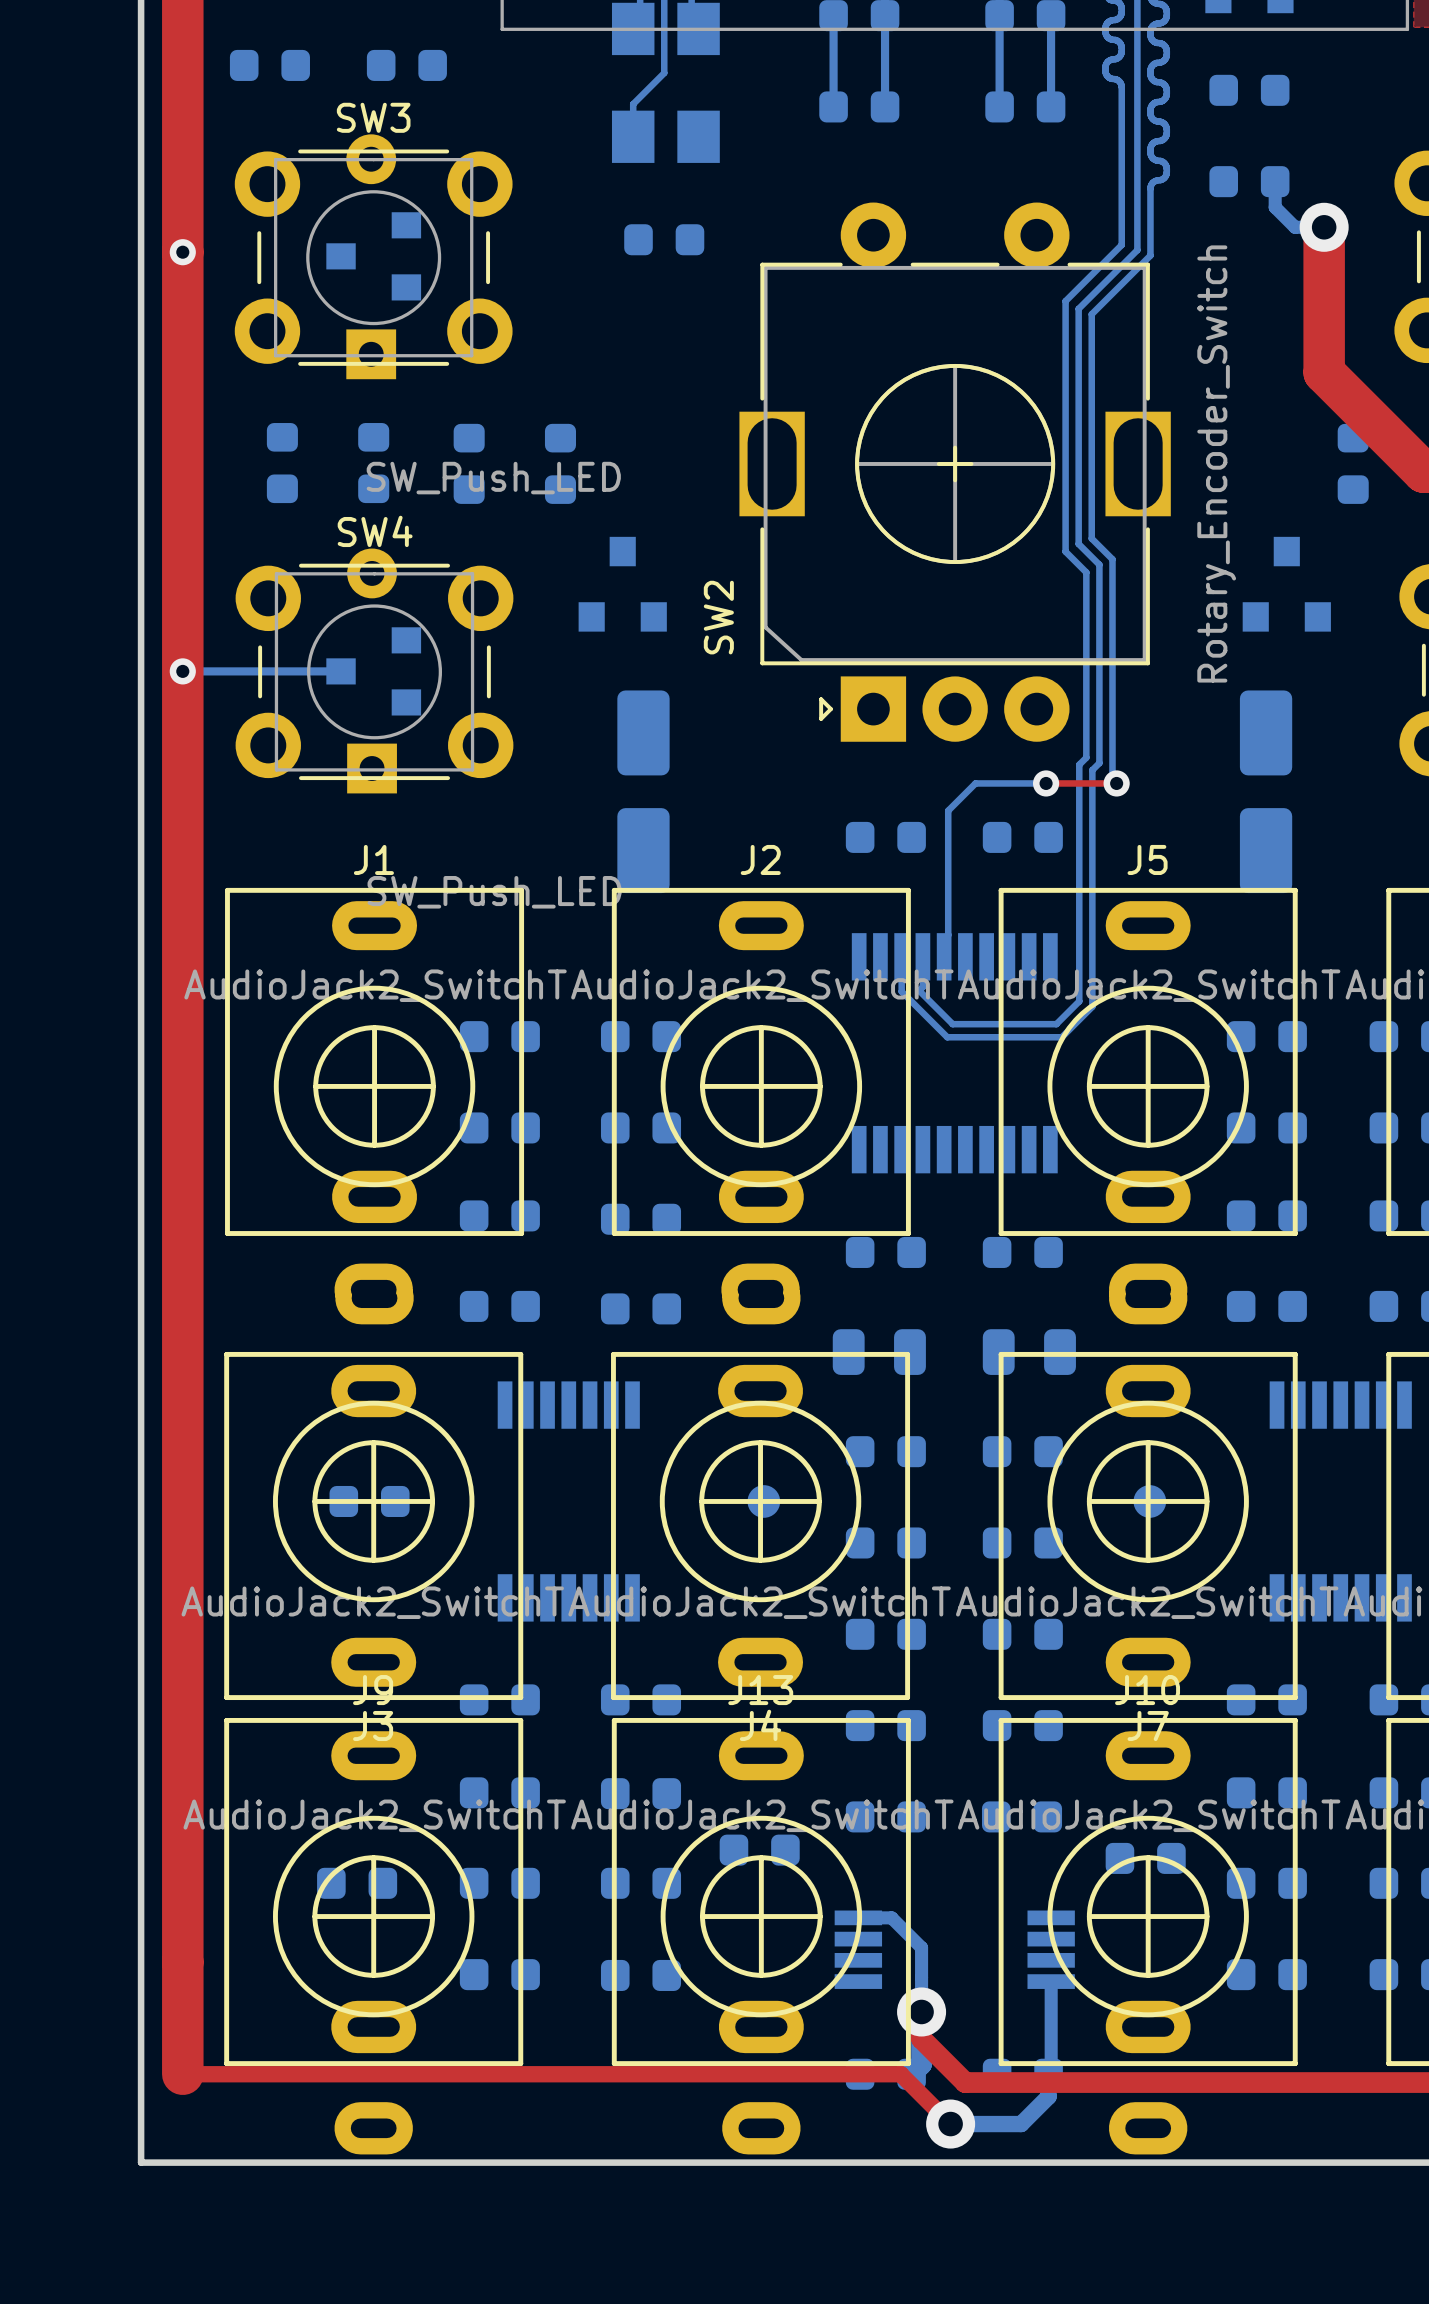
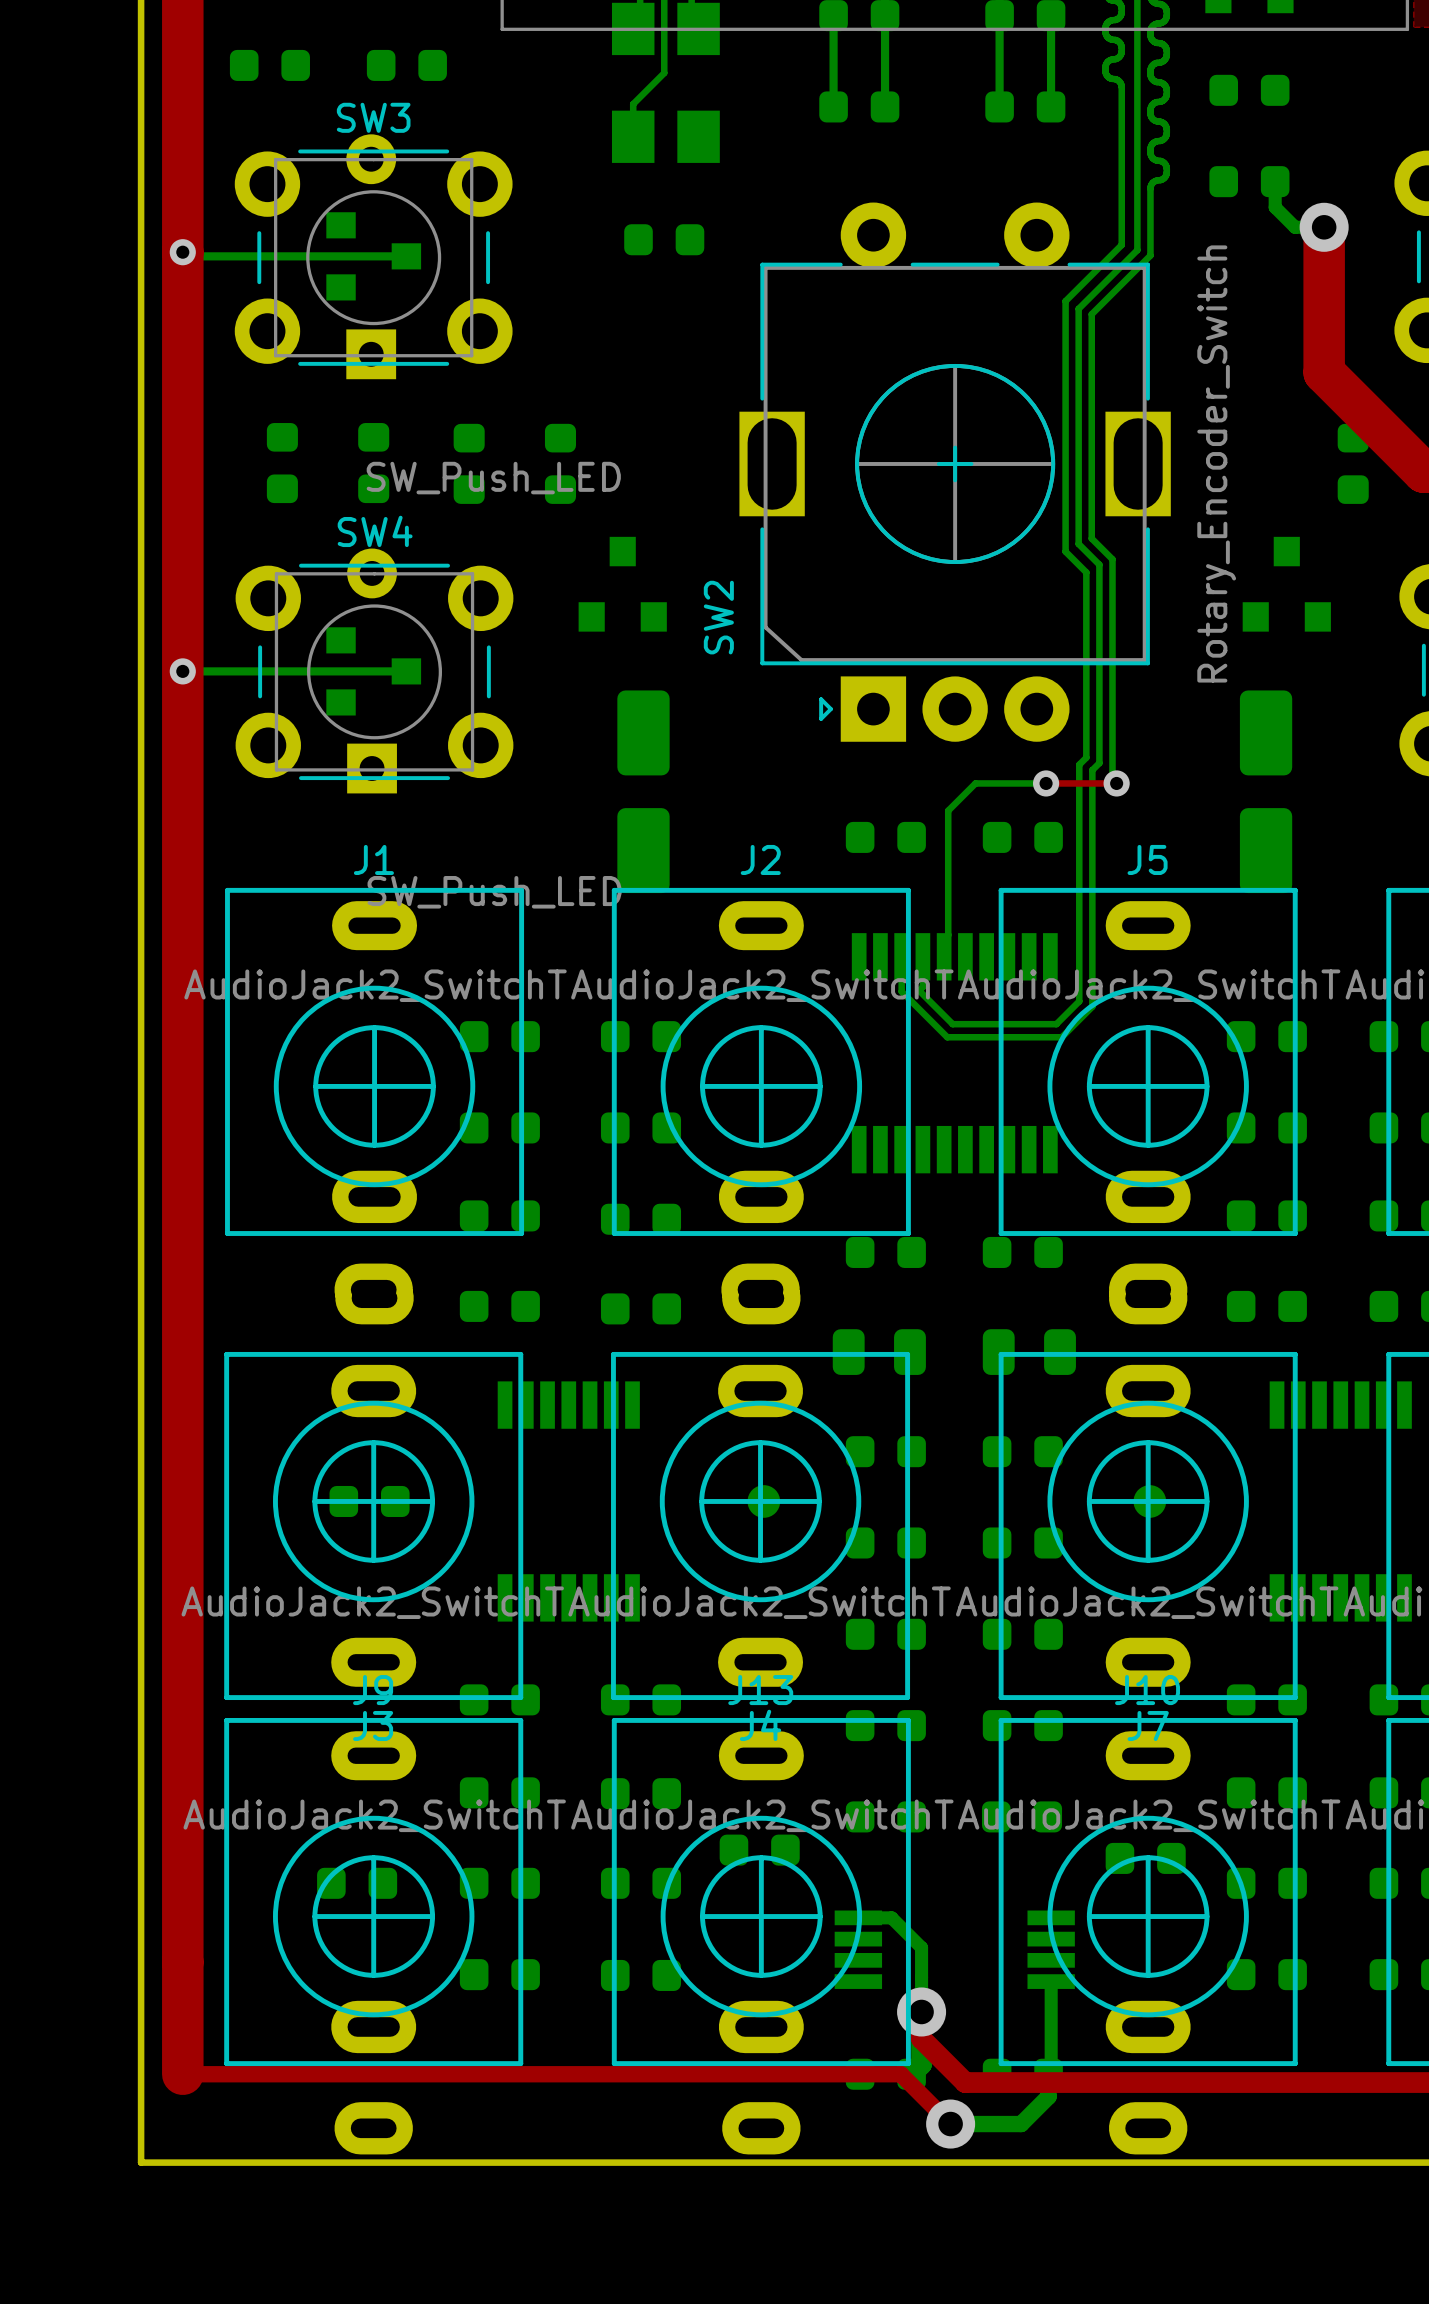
bottom track: none -> (186, 256) (406, 256)
part rotation: 0° (373, 256) -> 180° (373, 256)
bottom track: none -> (341, 671) (406, 671)
part rotation: 0° (373, 671) -> 180° (373, 671)

